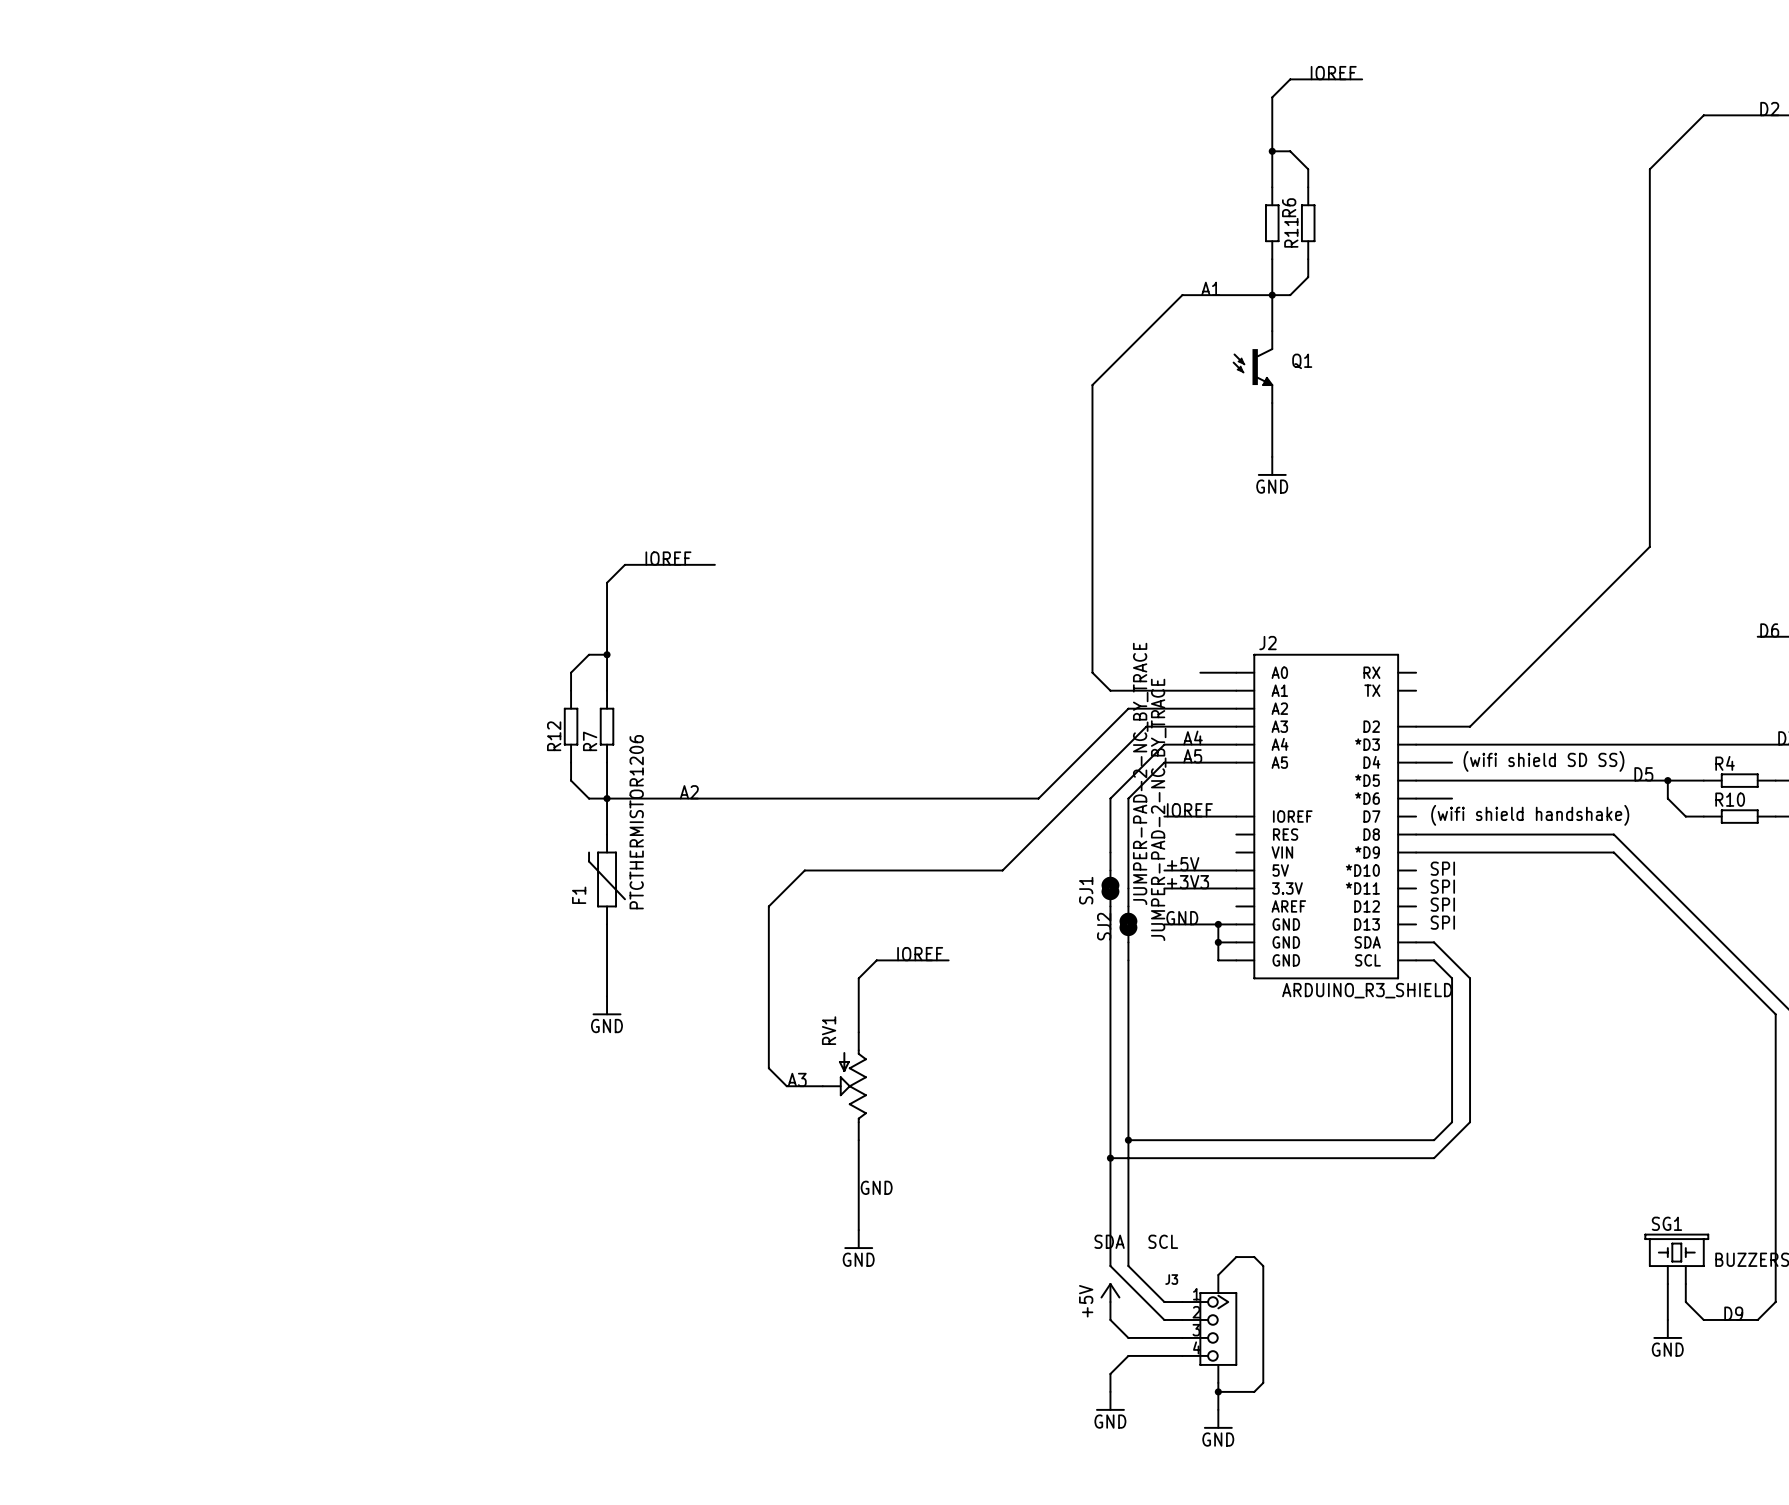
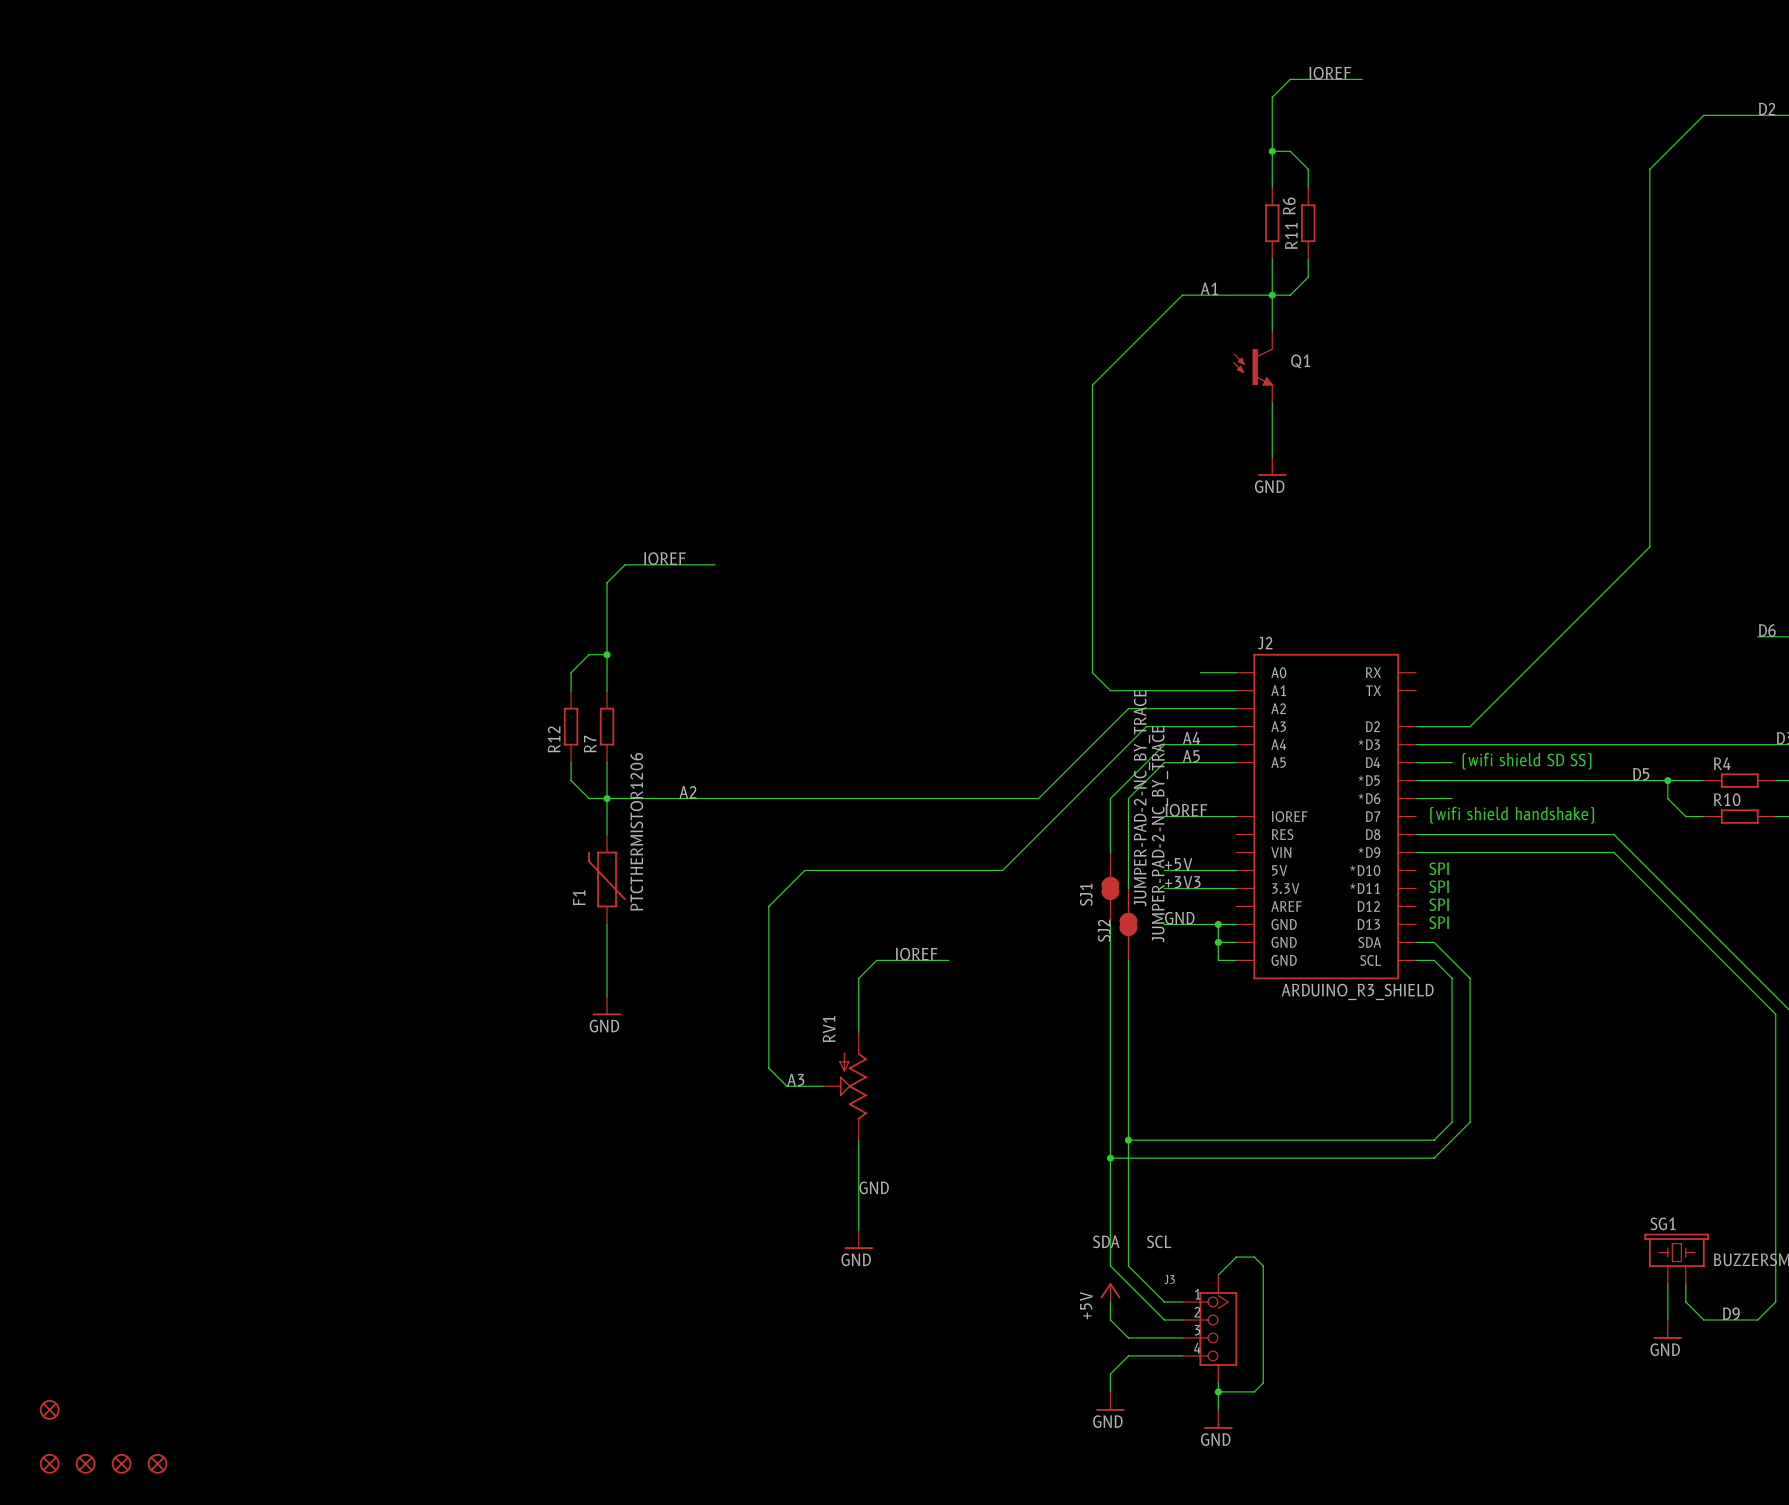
part: none -> (49, 1409)
part: none -> (49, 1463)
part: none -> (85, 1463)
part: none -> (121, 1463)
part: none -> (157, 1463)

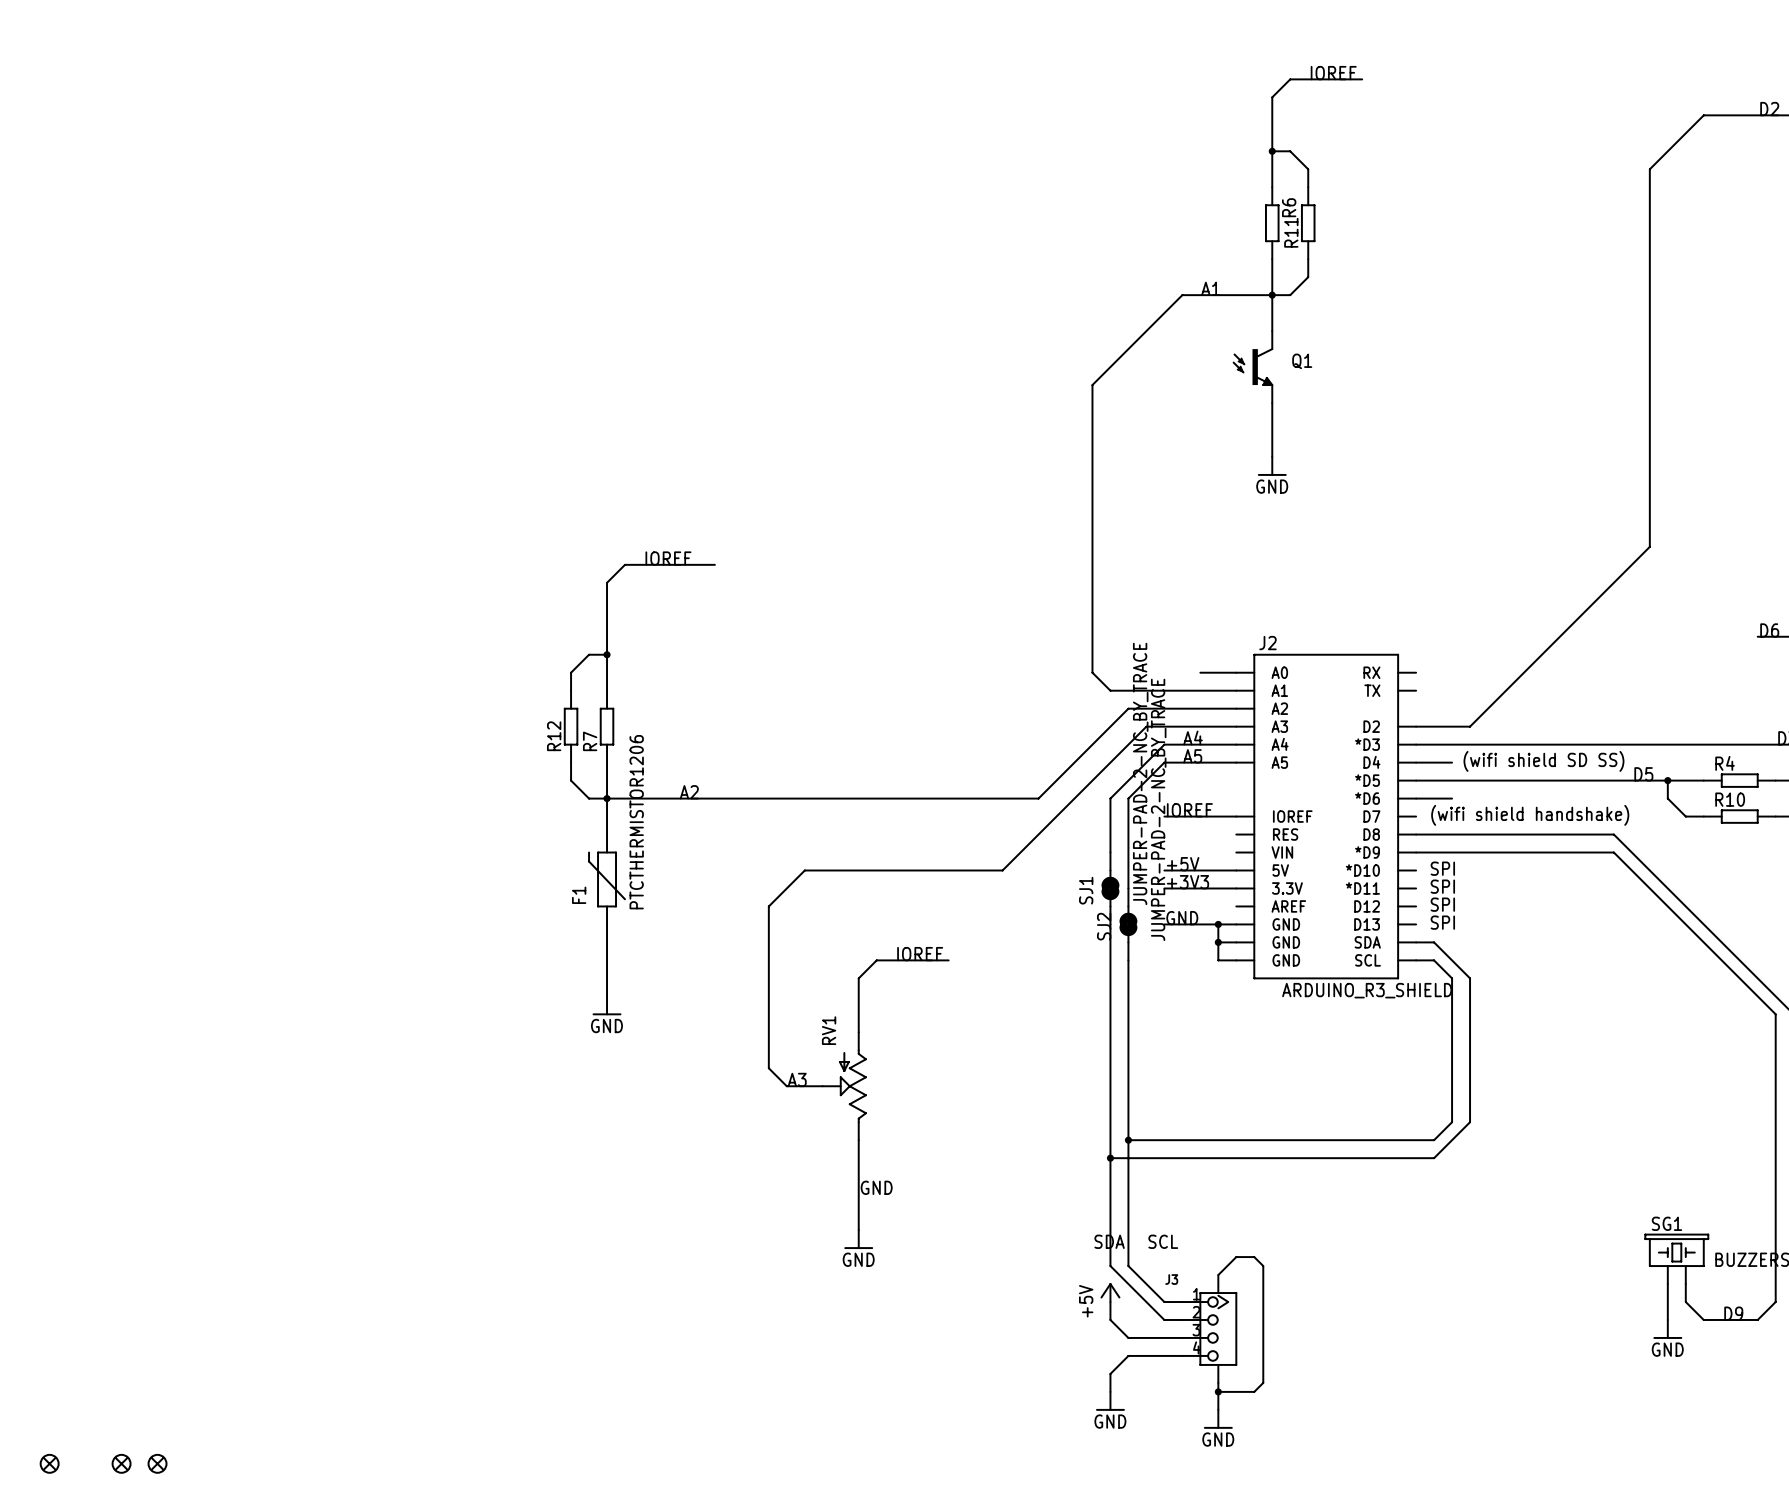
part: (49, 1409) -> none
part: (85, 1463) -> none

